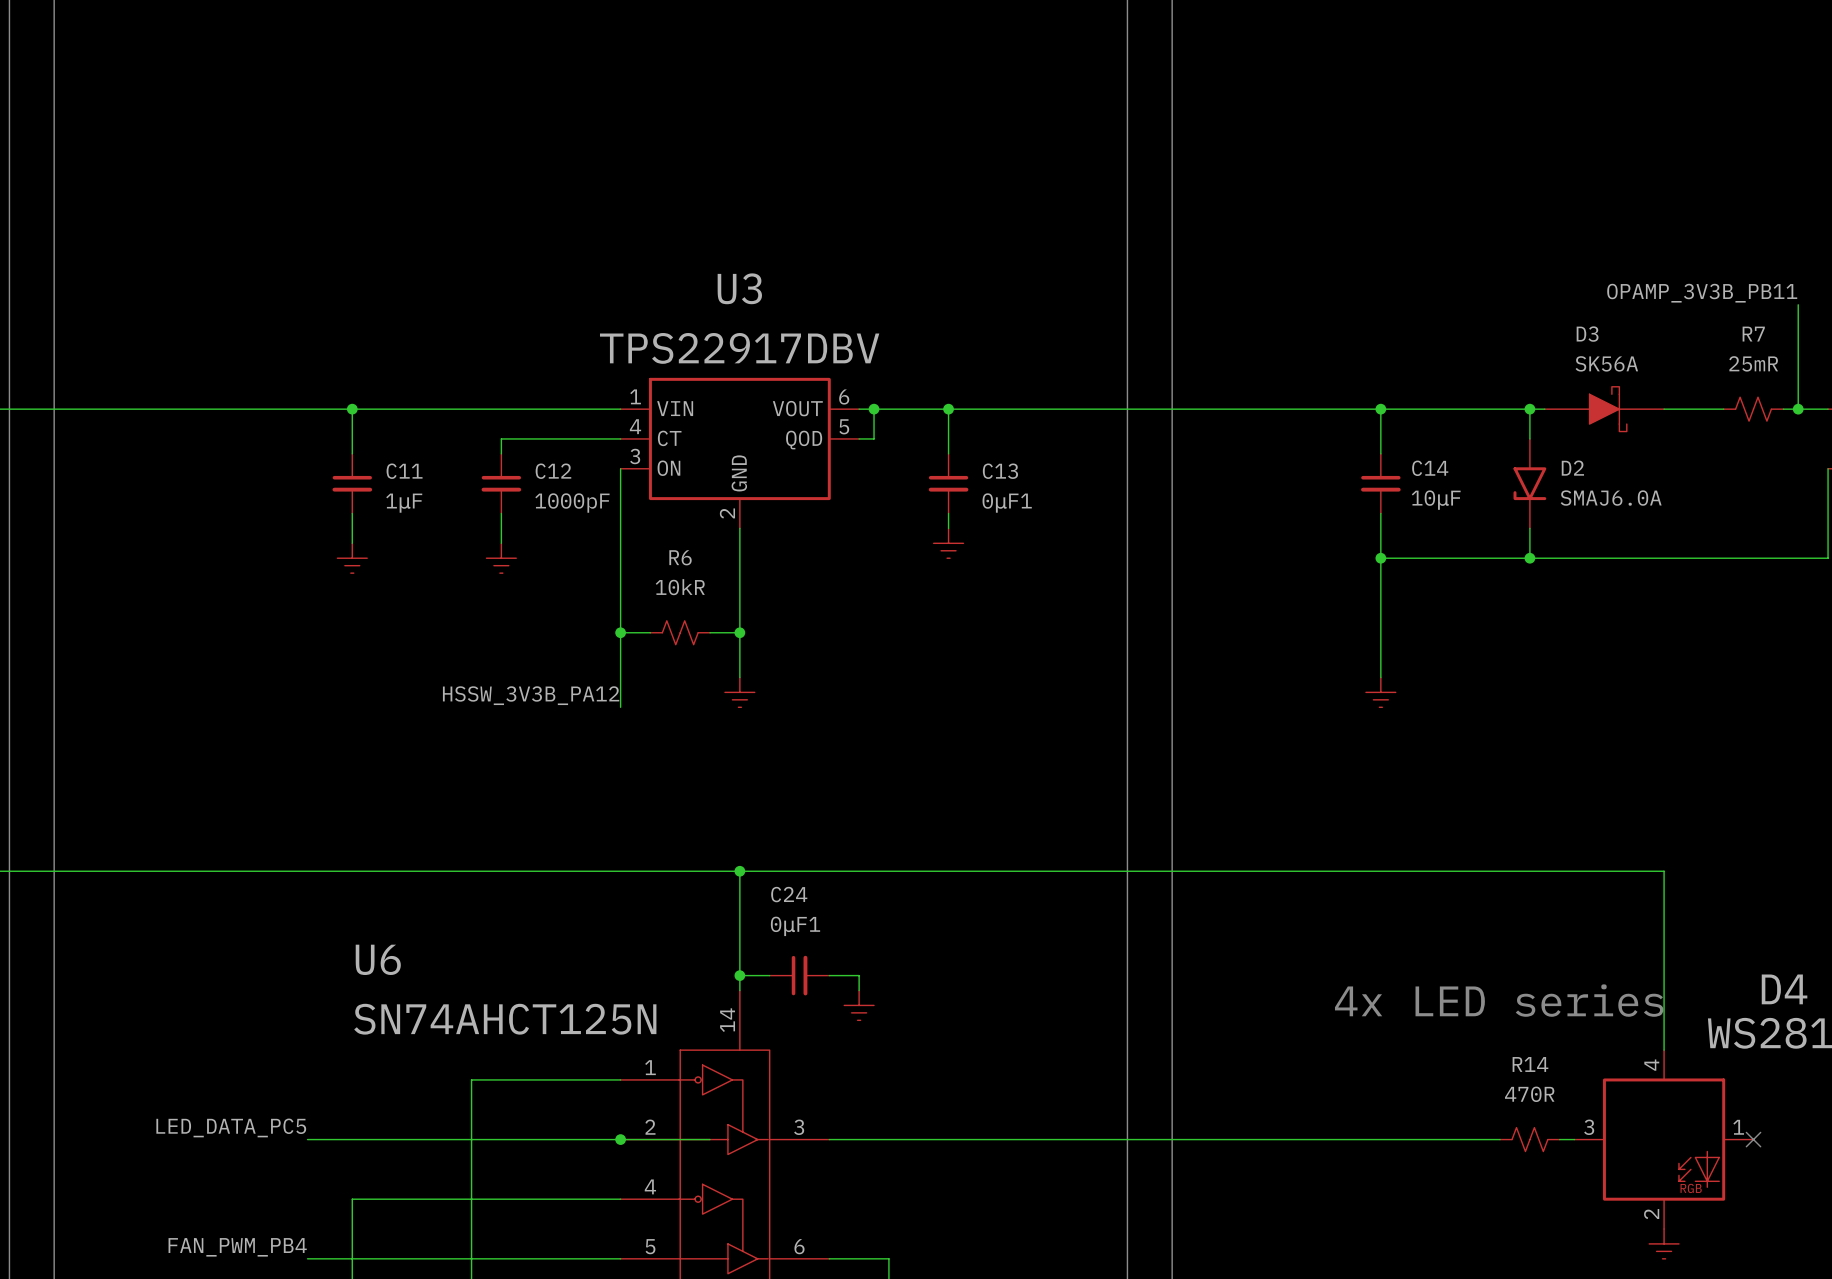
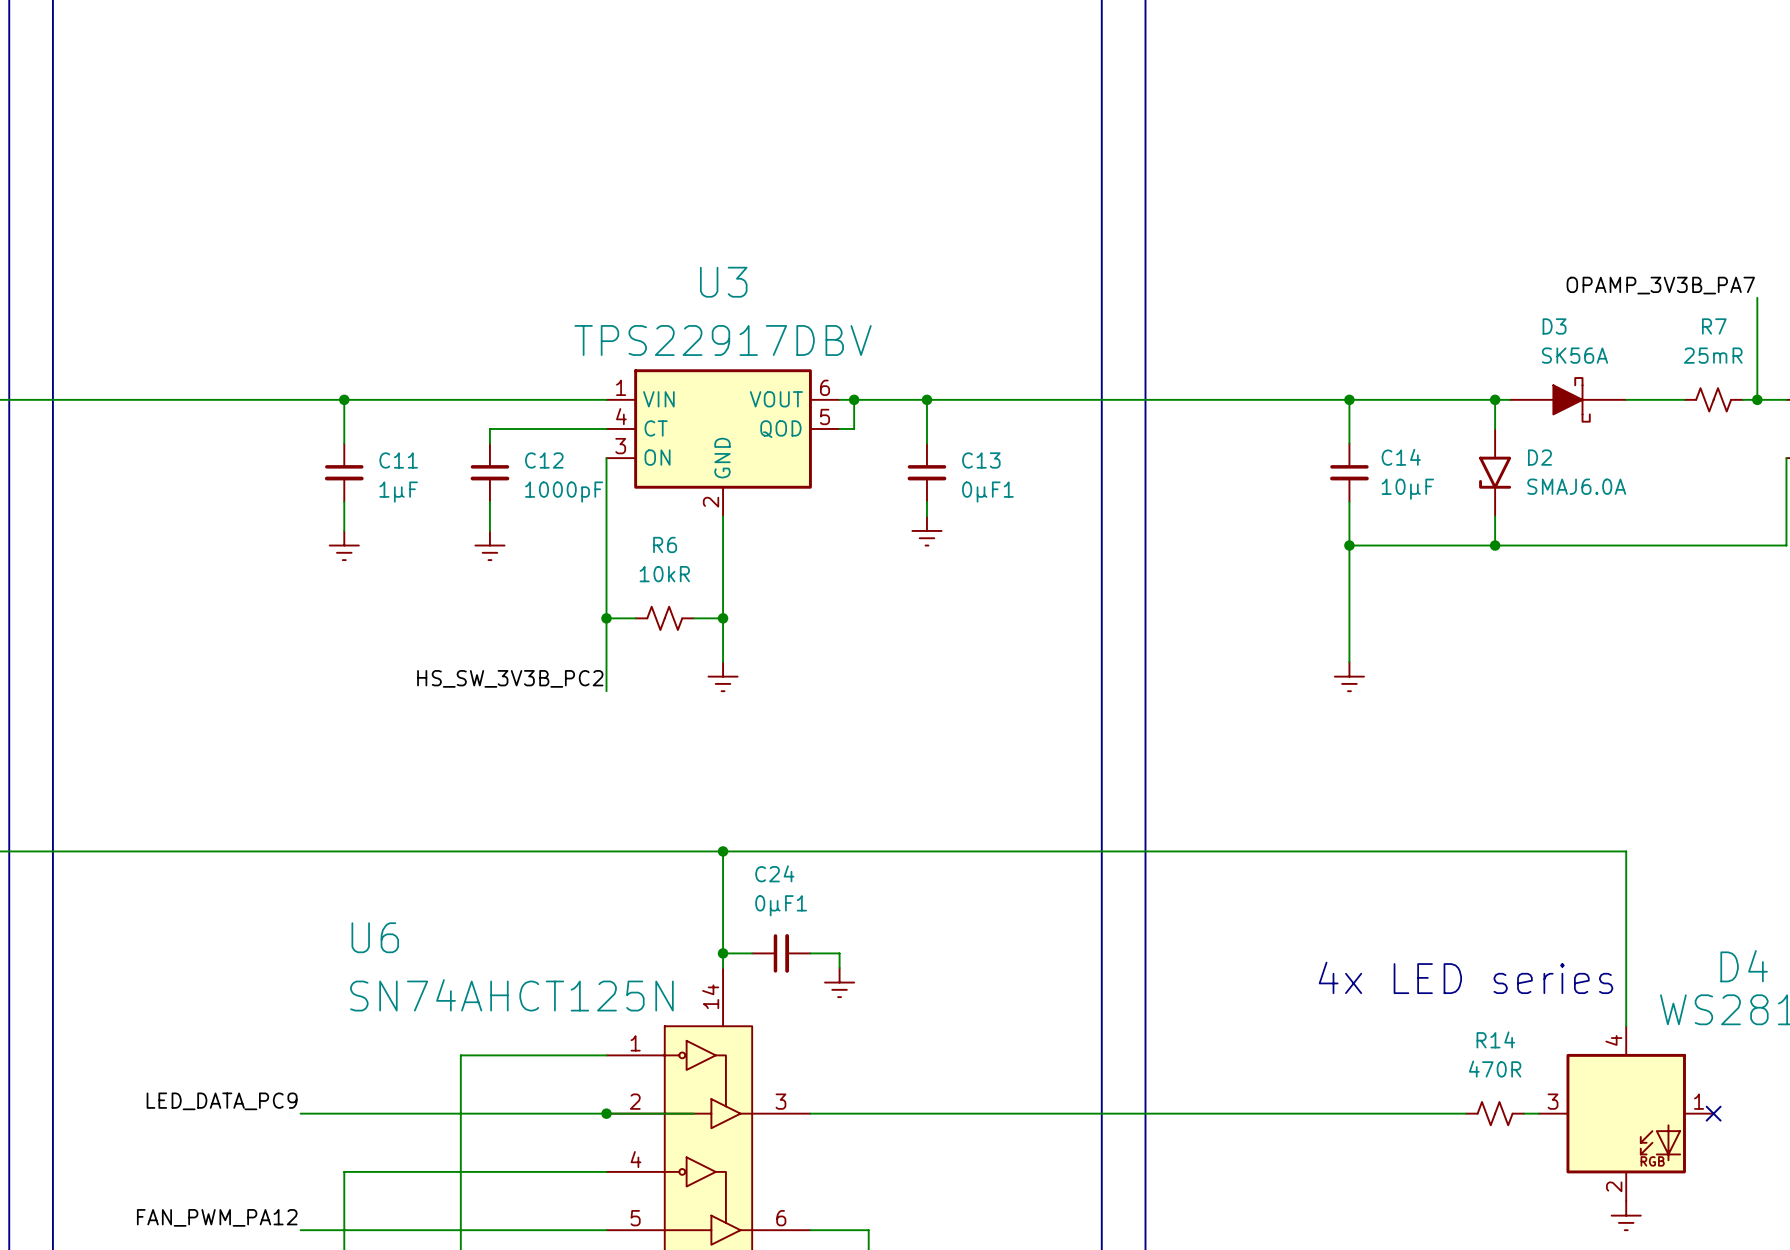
label: OPAMP_3V3B_PB11 (1702, 293) -> OPAMP_3V3B_PA7 (1660, 285)
label: HSSW_3V3B_PA12 (531, 695) -> HS_SW_3V3B_PC2 (510, 678)
label: LED_DATA_PC5 (231, 1127) -> LED_DATA_PC9 (222, 1101)
label: FAN_PWM_PB4 (237, 1247) -> FAN_PWM_PA12 (217, 1217)

